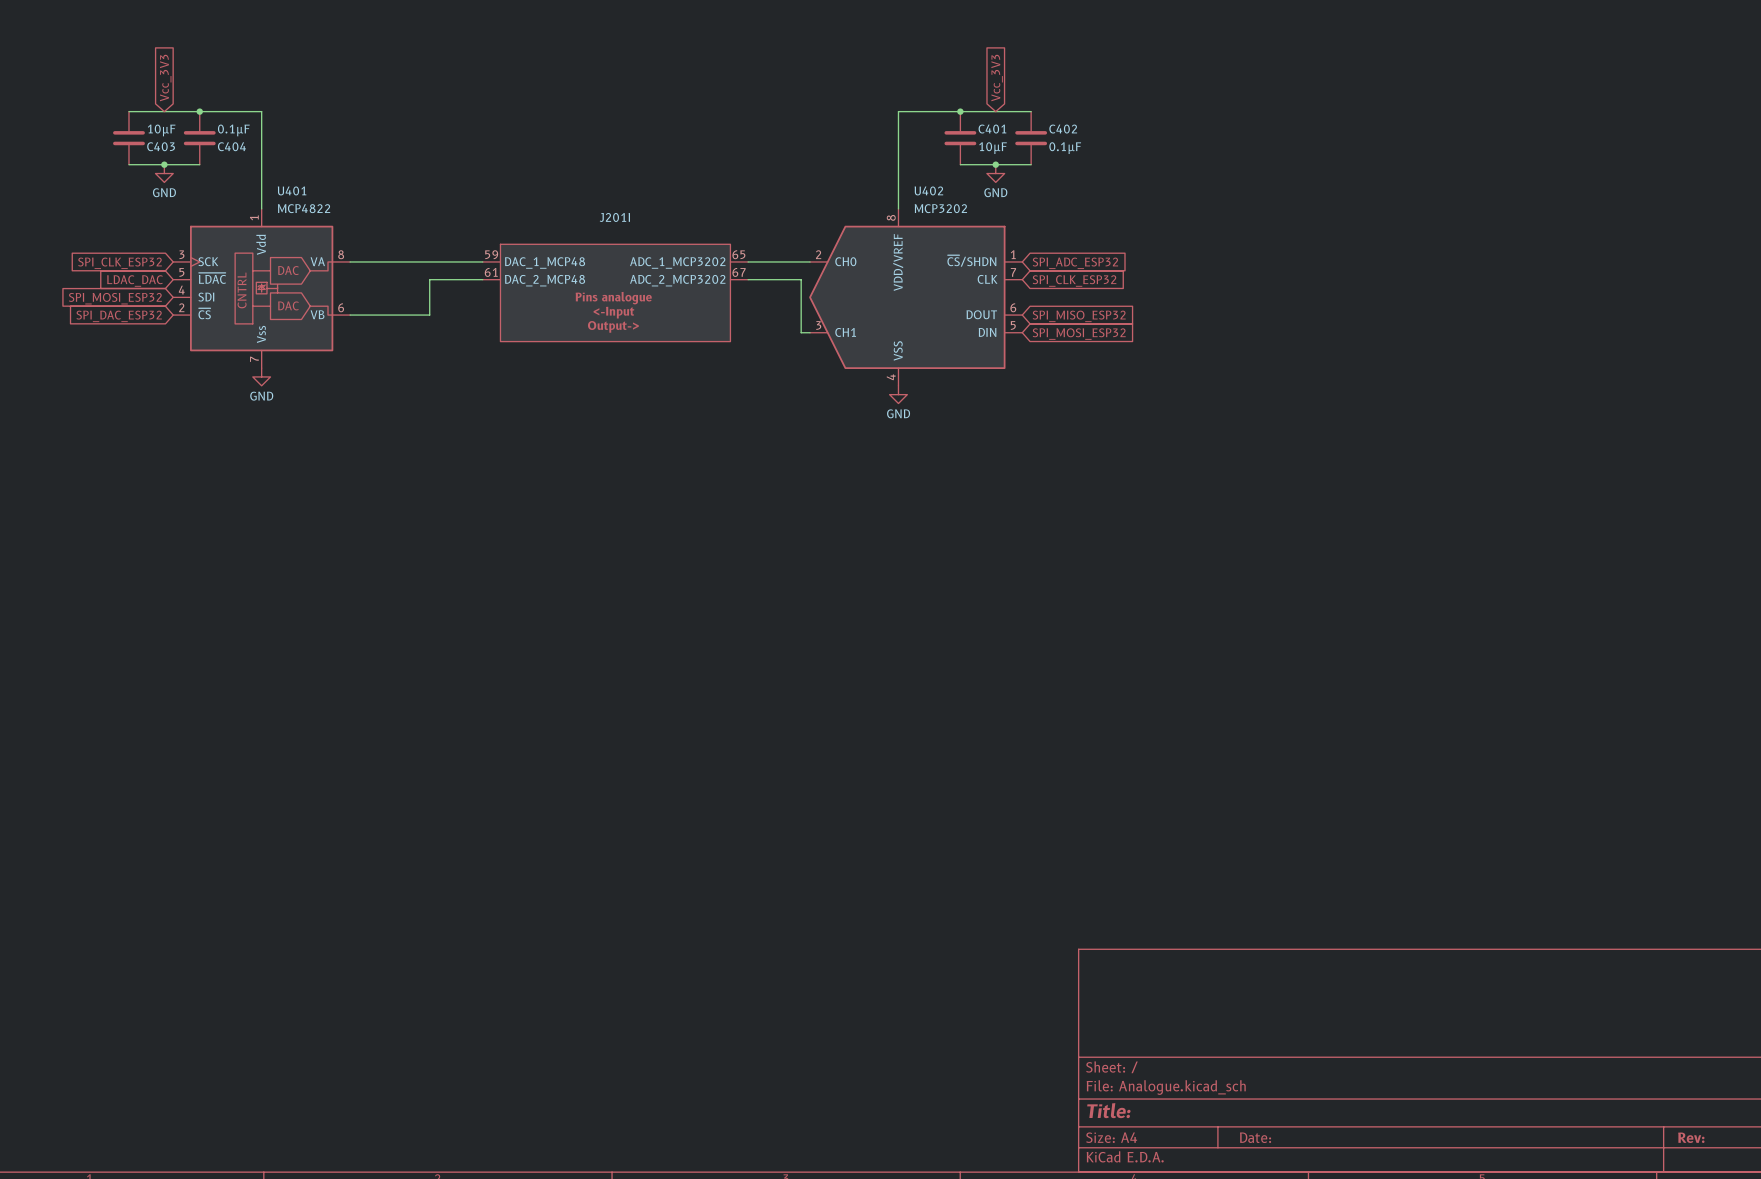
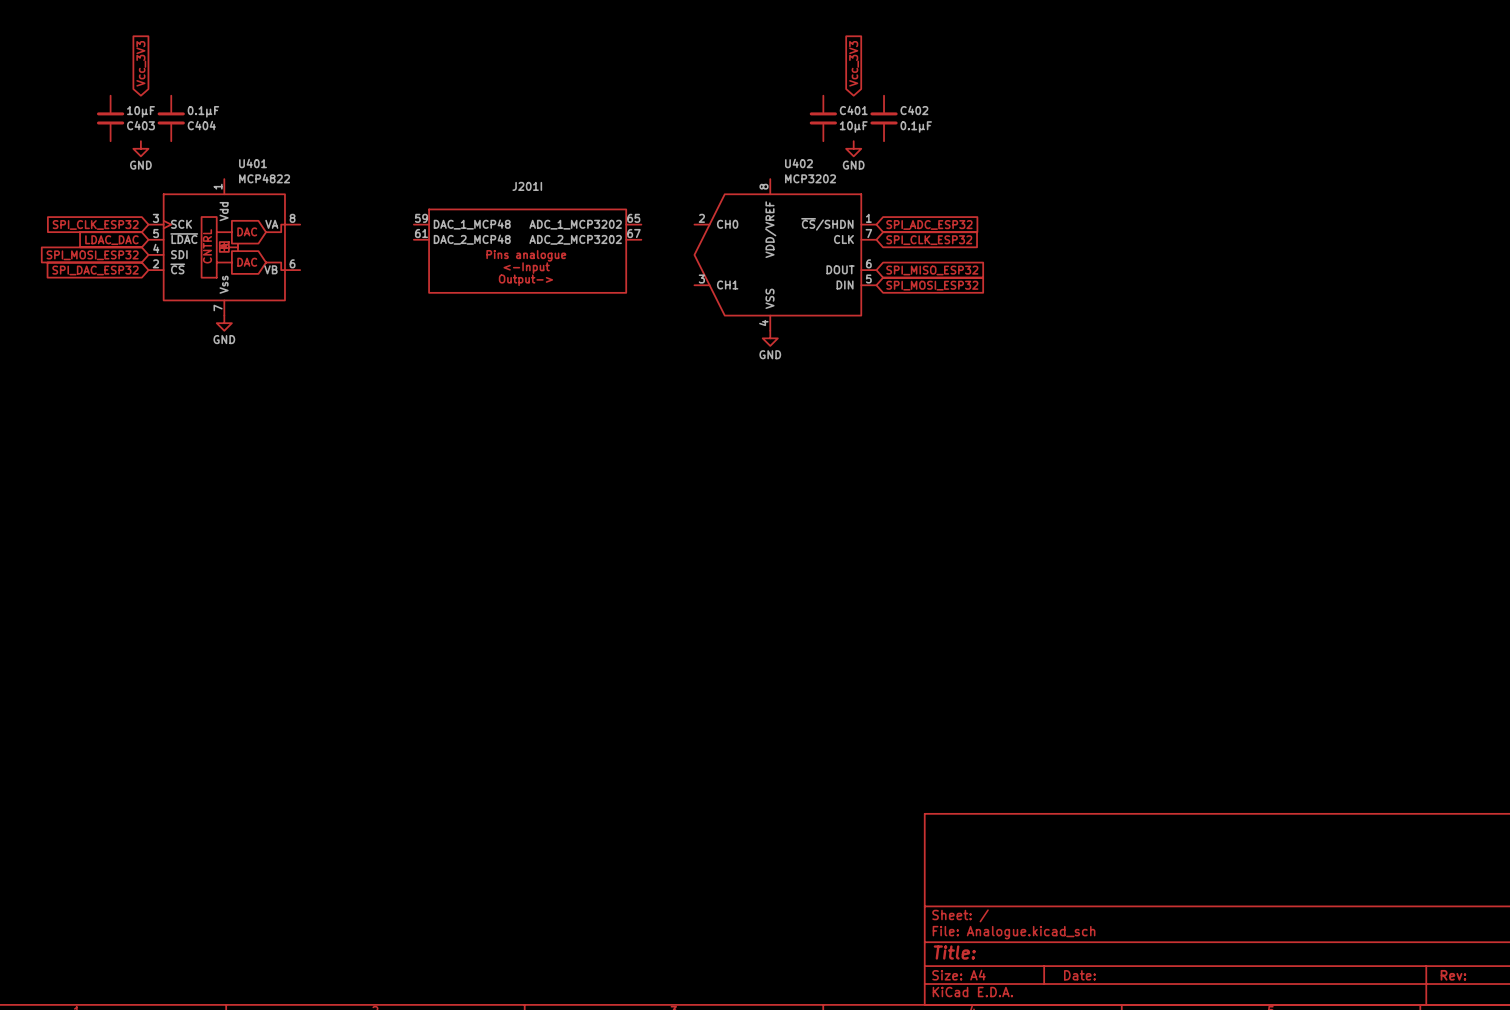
wire: (128, 111) (261, 111) (261, 208) -> none
junction: (199, 111) -> none
junction: (960, 111) -> none
wire: (1031, 111) (898, 111) (898, 208) -> none
wire: (128, 164) (199, 164) -> none
junction: (164, 164) -> none
wire: (960, 164) (1031, 164) -> none
junction: (995, 164) -> none
wire: (350, 261) (482, 261) -> none
wire: (748, 261) (810, 261) -> none
wire: (482, 279) (429, 279) (429, 315) (350, 315) -> none
wire: (748, 279) (801, 279) (801, 332) (810, 332) -> none

